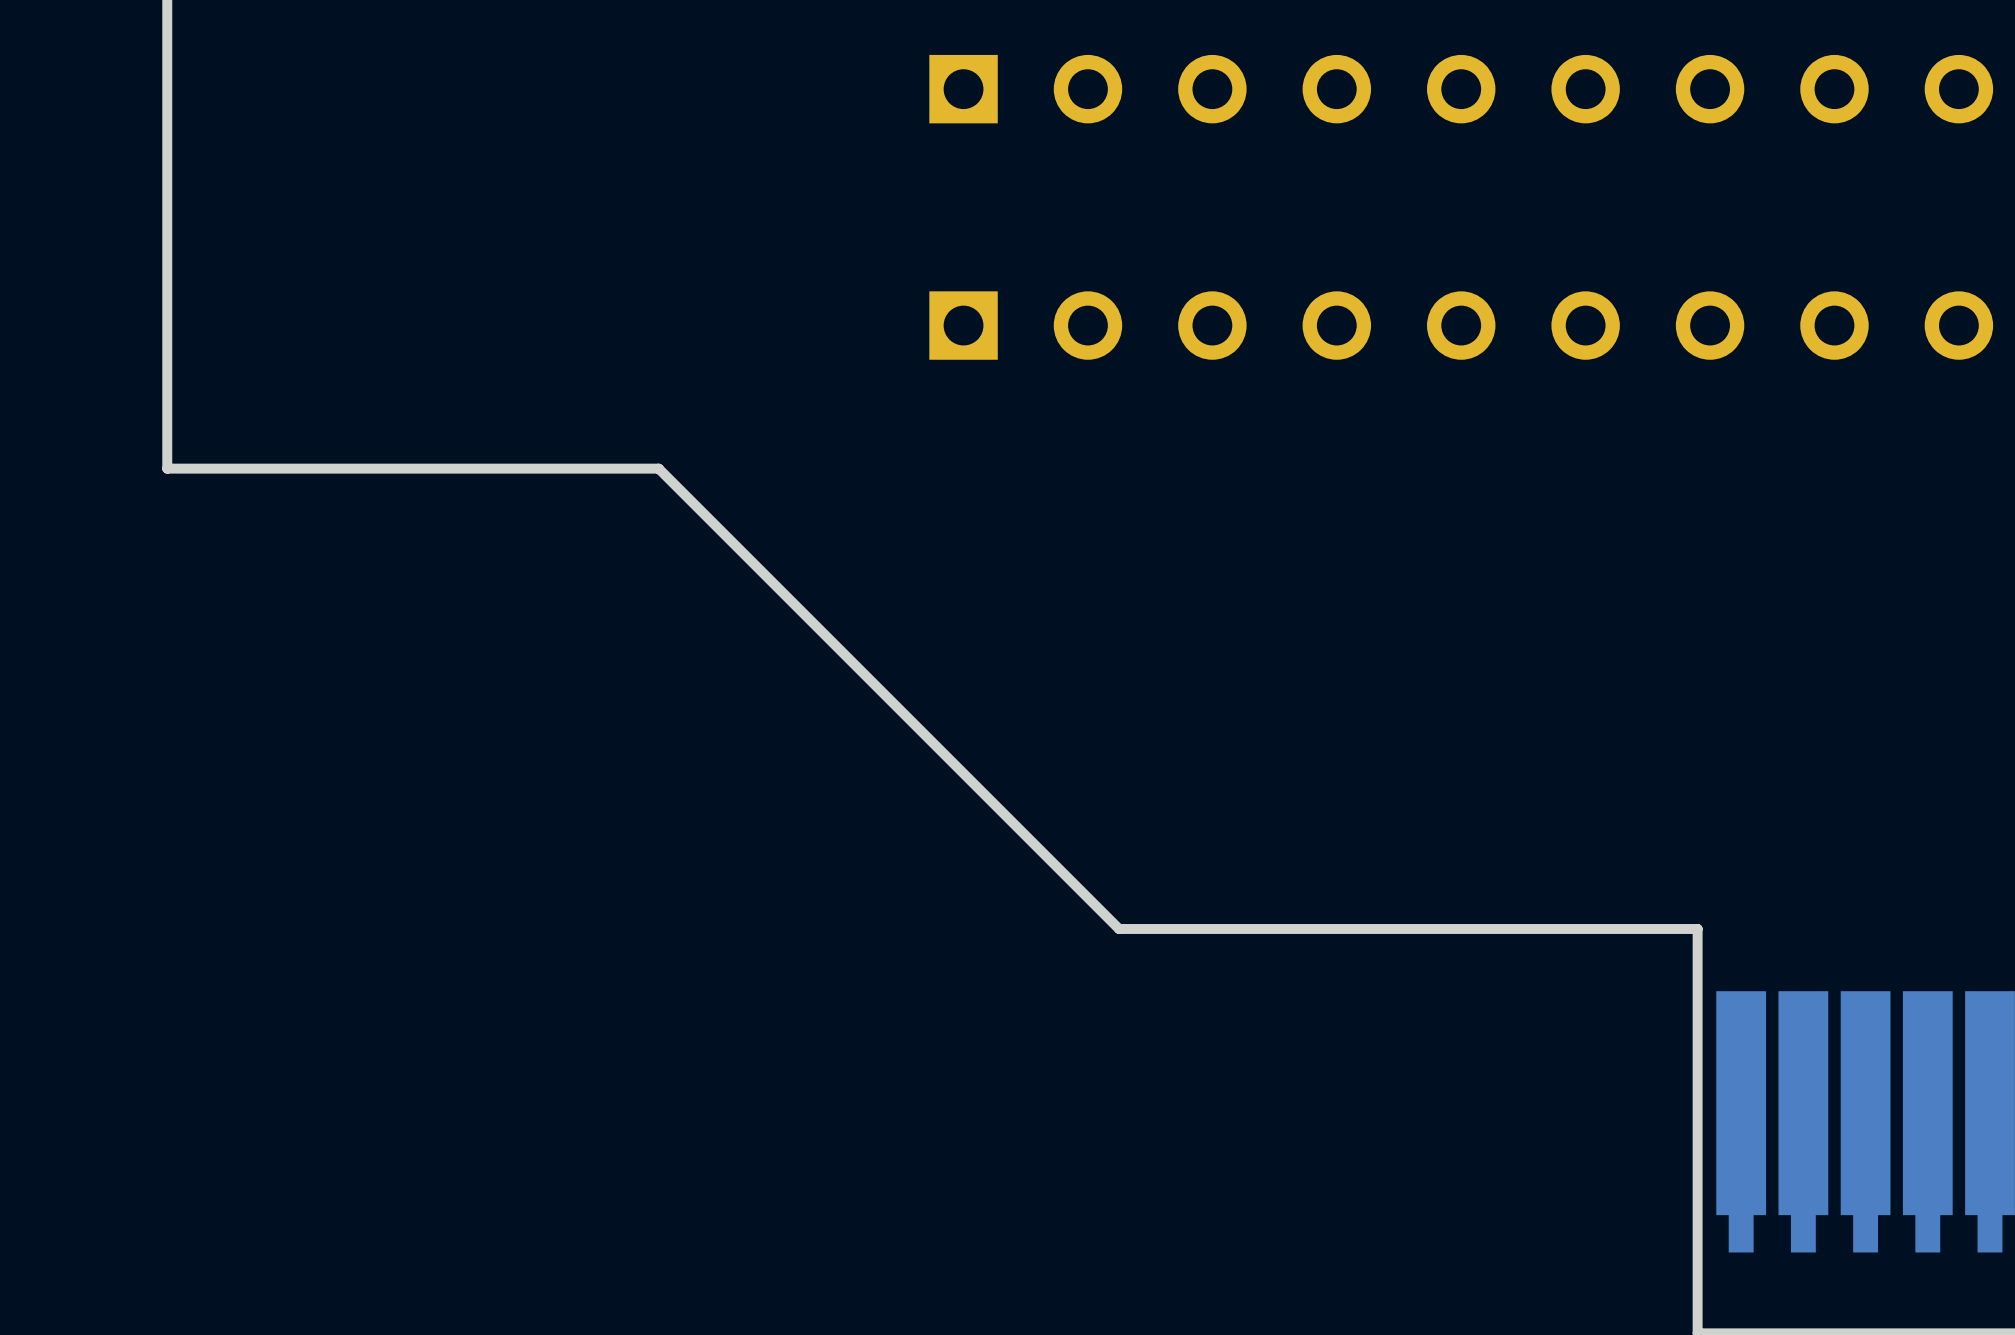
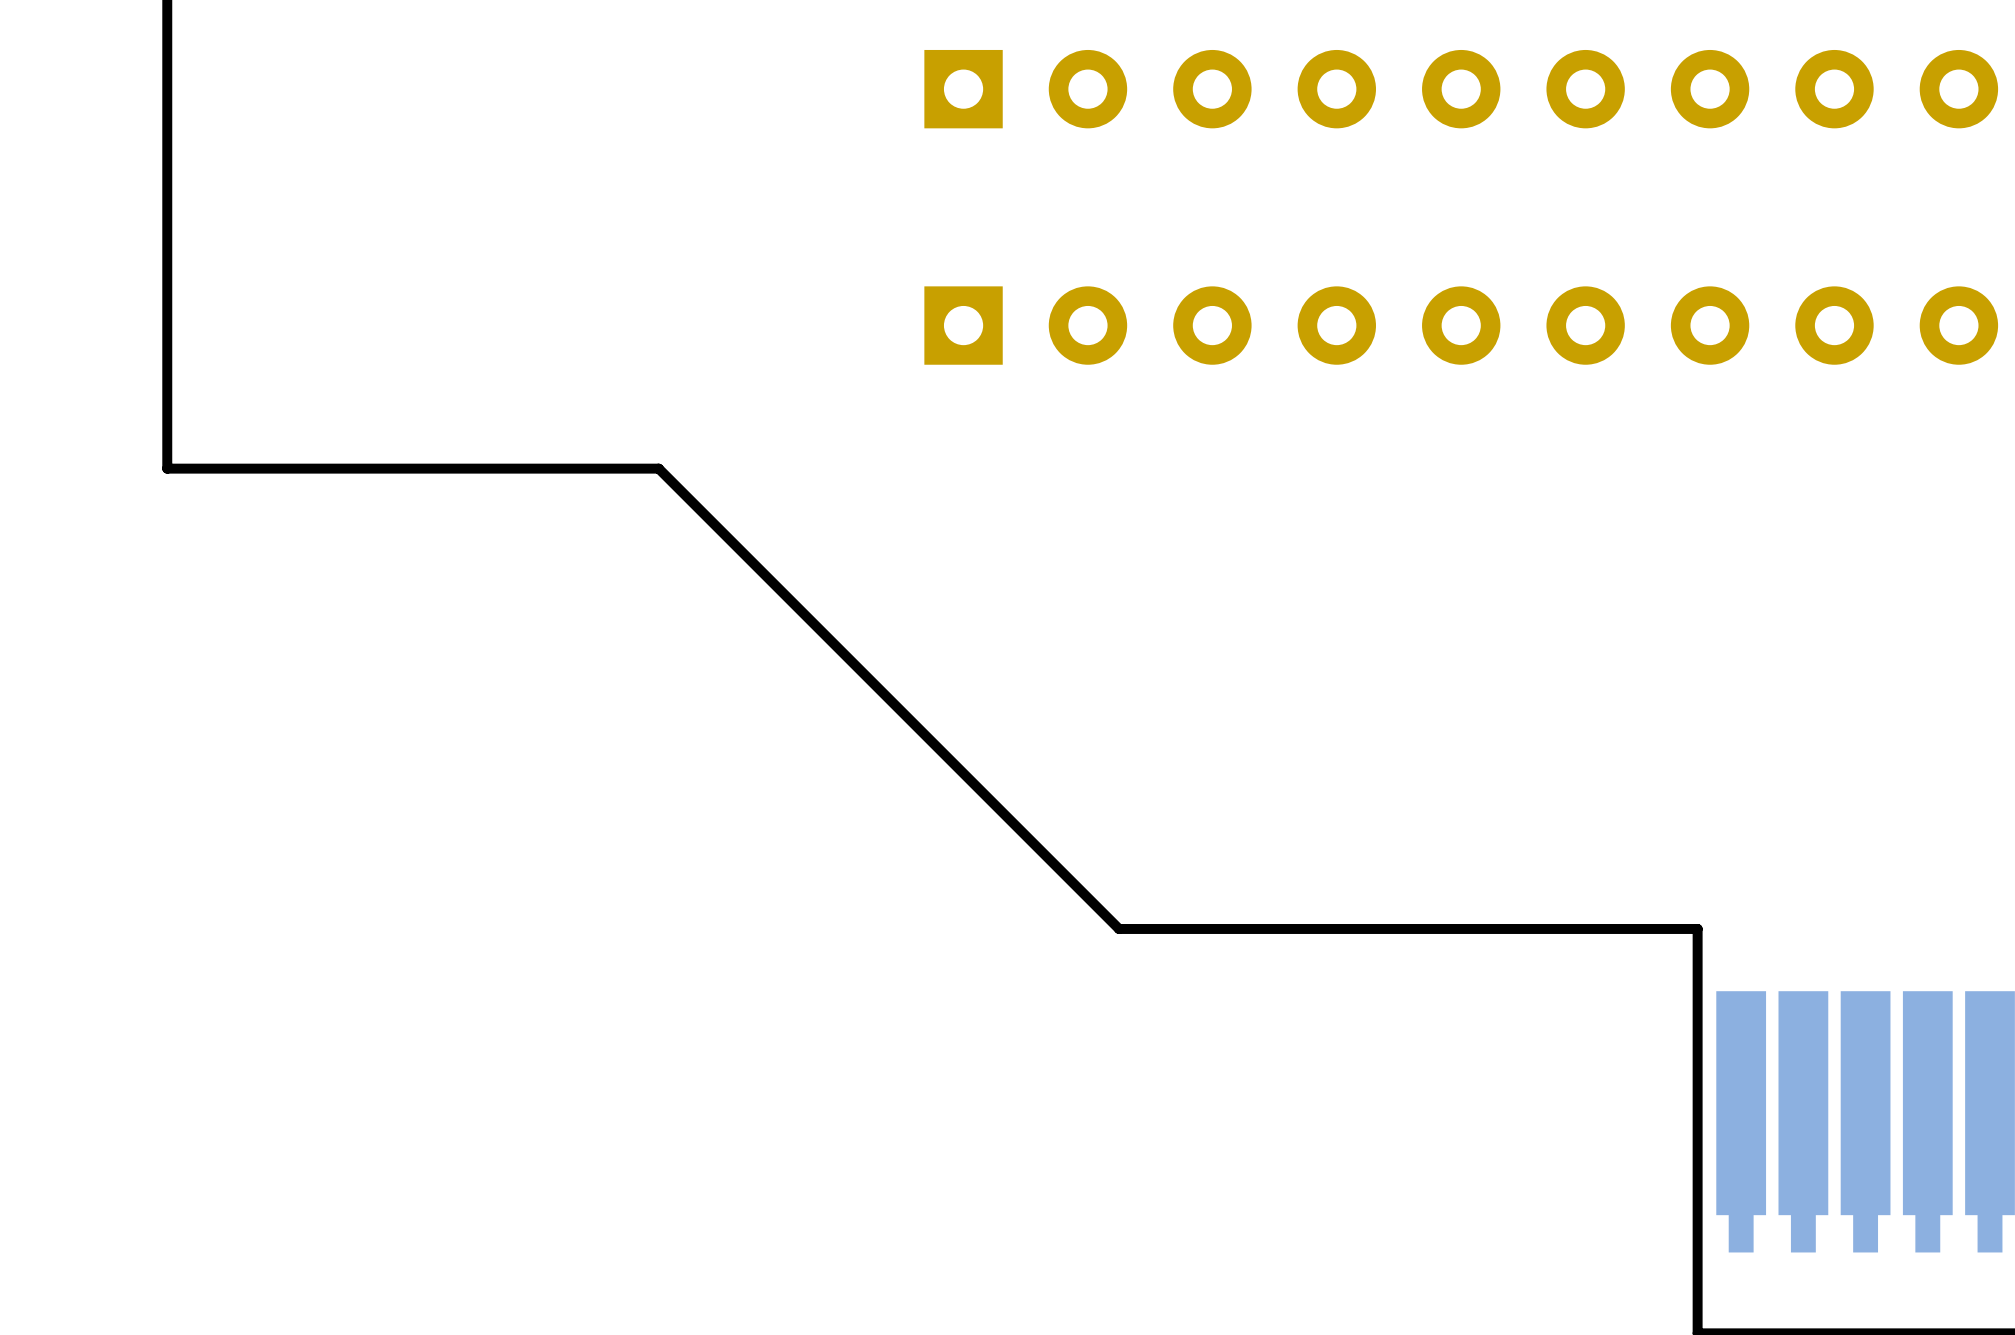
part footprint: [929, 54, 1994, 124] -> [924, 49, 1999, 129]
part footprint: [929, 291, 1994, 360] -> [924, 286, 1999, 365]

